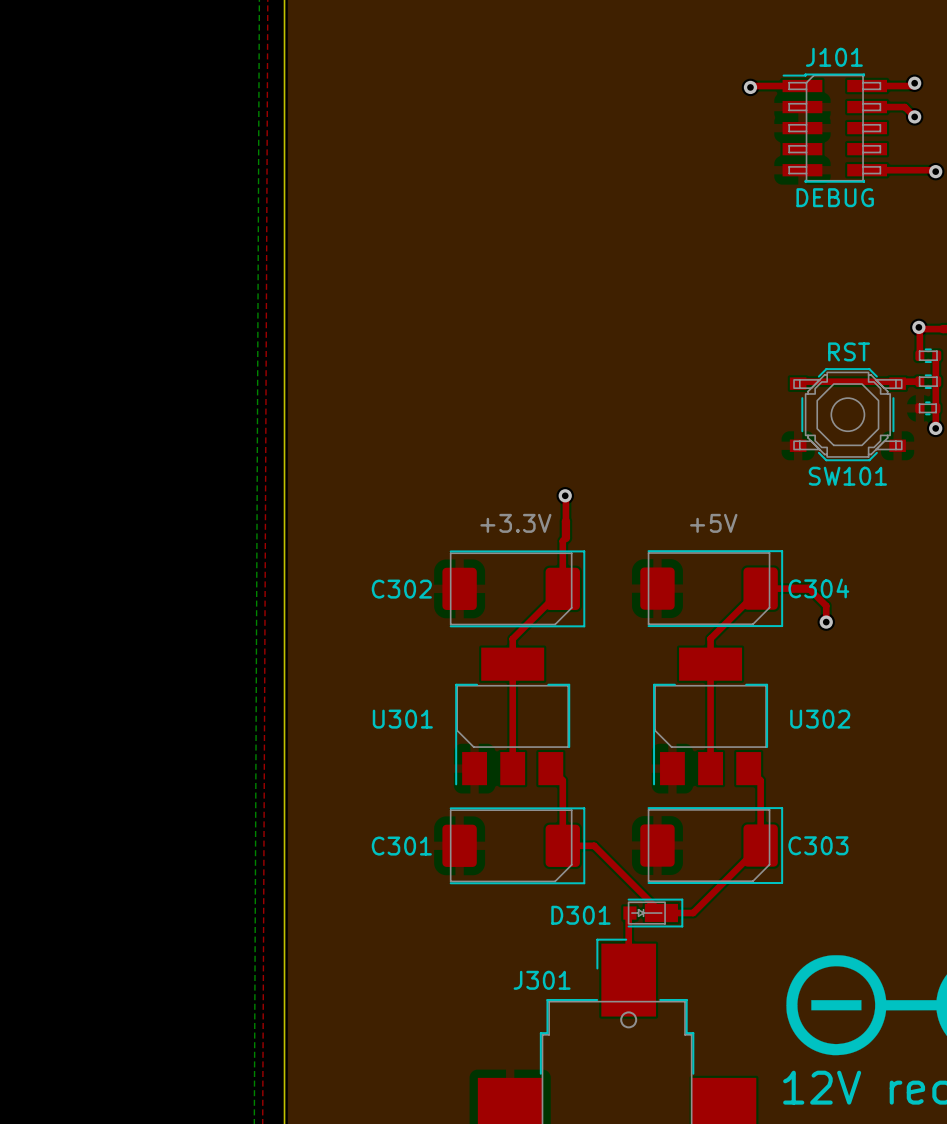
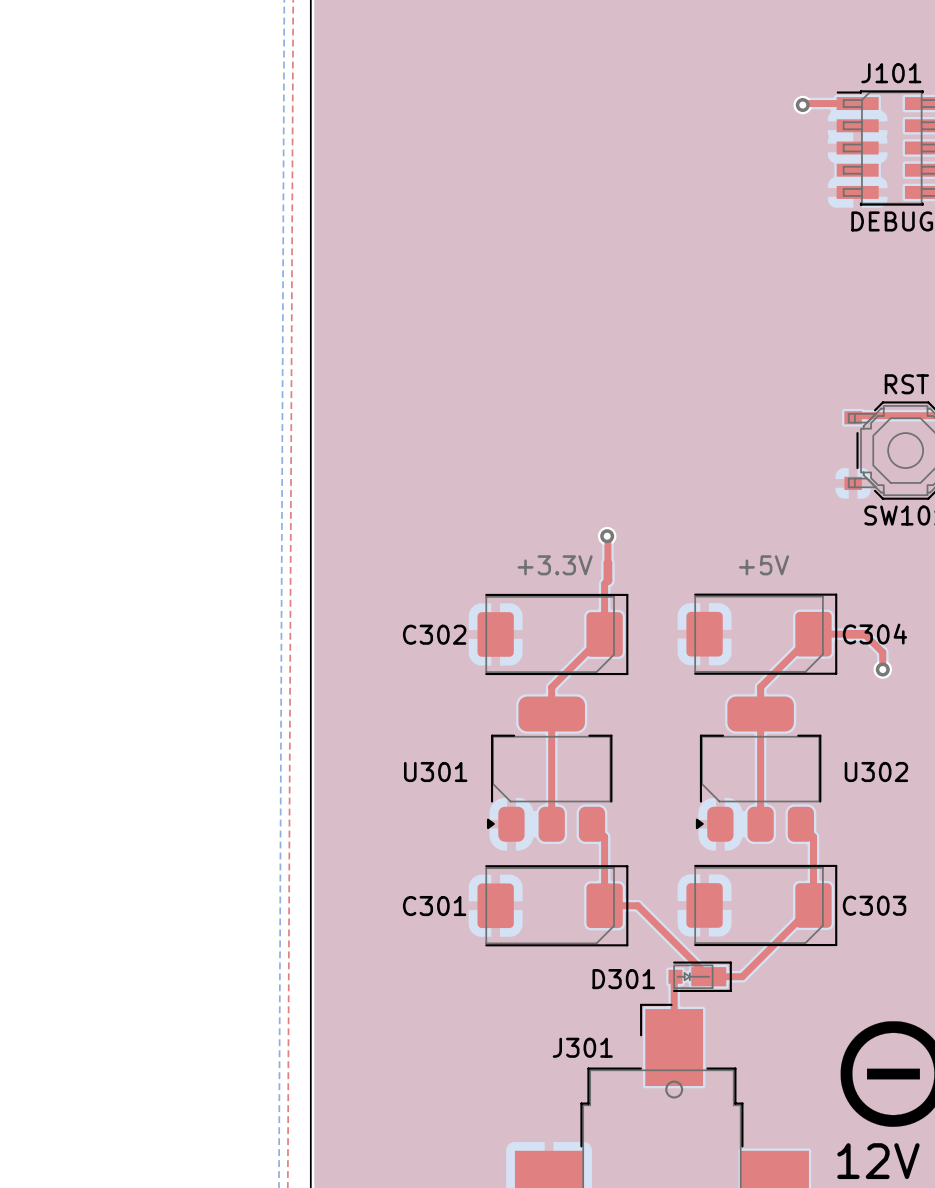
U301 footprint: [455, 647, 571, 786] -> [486, 696, 613, 842]
U302 footprint: [653, 647, 769, 786] -> [695, 696, 822, 842]

